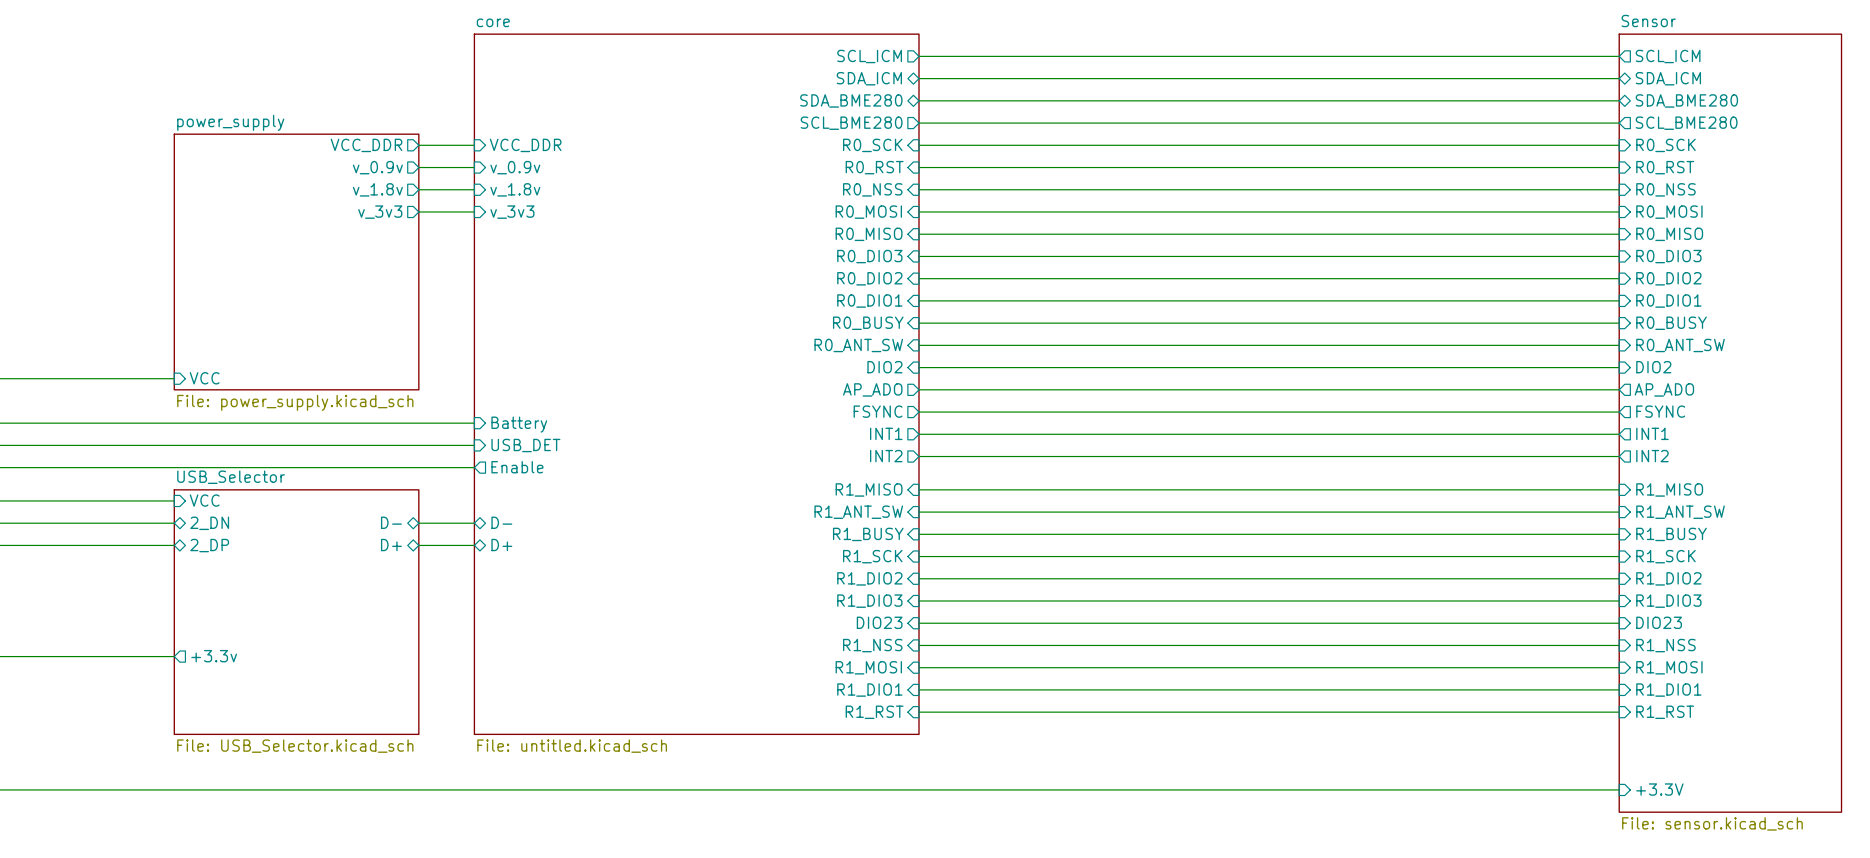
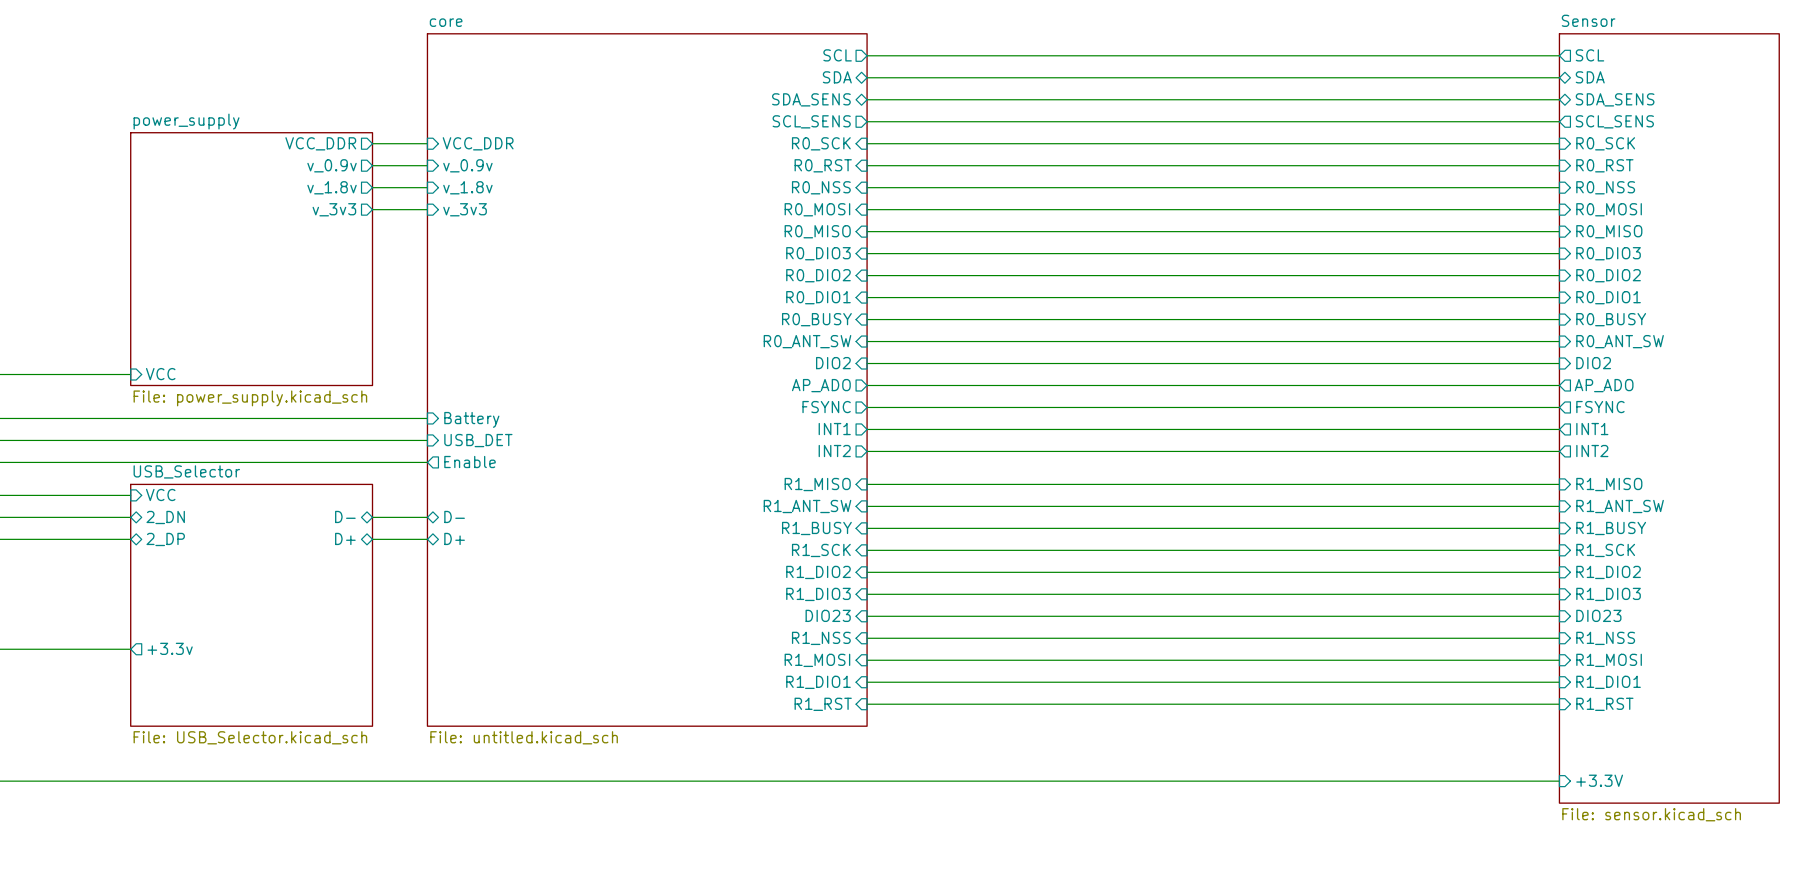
sheet pin: SCL_ICM (869, 56) -> SCL (837, 55)
sheet pin: SCL_ICM (1668, 56) -> SCL (1589, 55)
sheet pin: SDA_ICM (869, 78) -> SDA (837, 77)
sheet pin: SDA_ICM (1668, 78) -> SDA (1590, 77)
sheet pin: SDA_BME280 (851, 100) -> SDA_SENS (811, 99)
sheet pin: SDA_BME280 (1686, 100) -> SDA_SENS (1615, 99)
sheet pin: SCL_BME280 (851, 123) -> SCL_SENS (811, 121)
sheet pin: SCL_BME280 (1686, 123) -> SCL_SENS (1614, 121)

